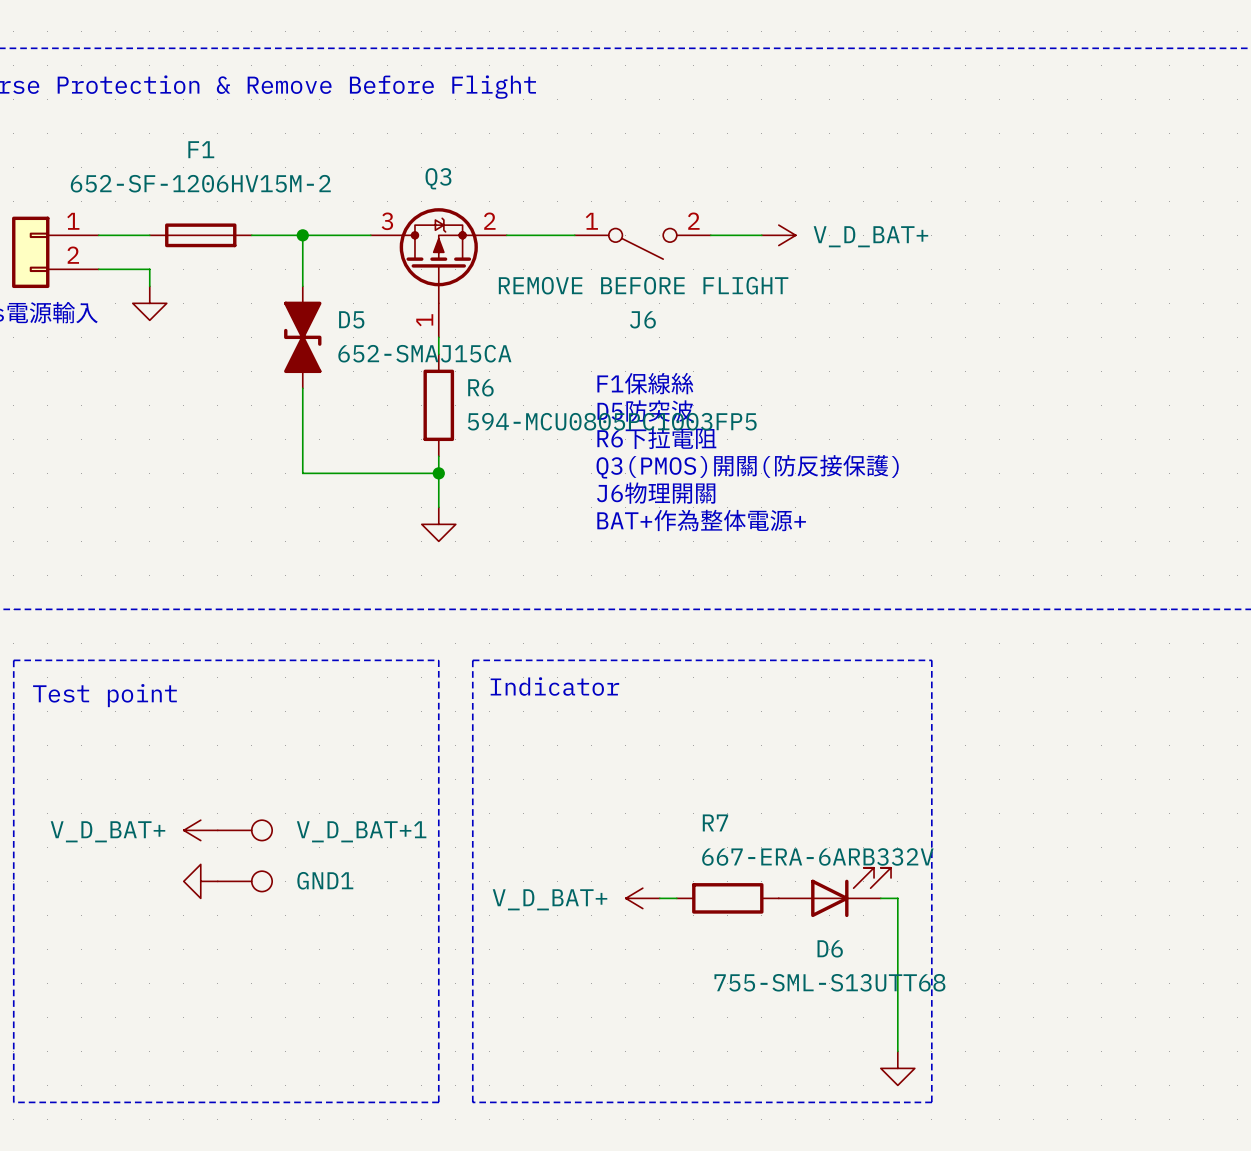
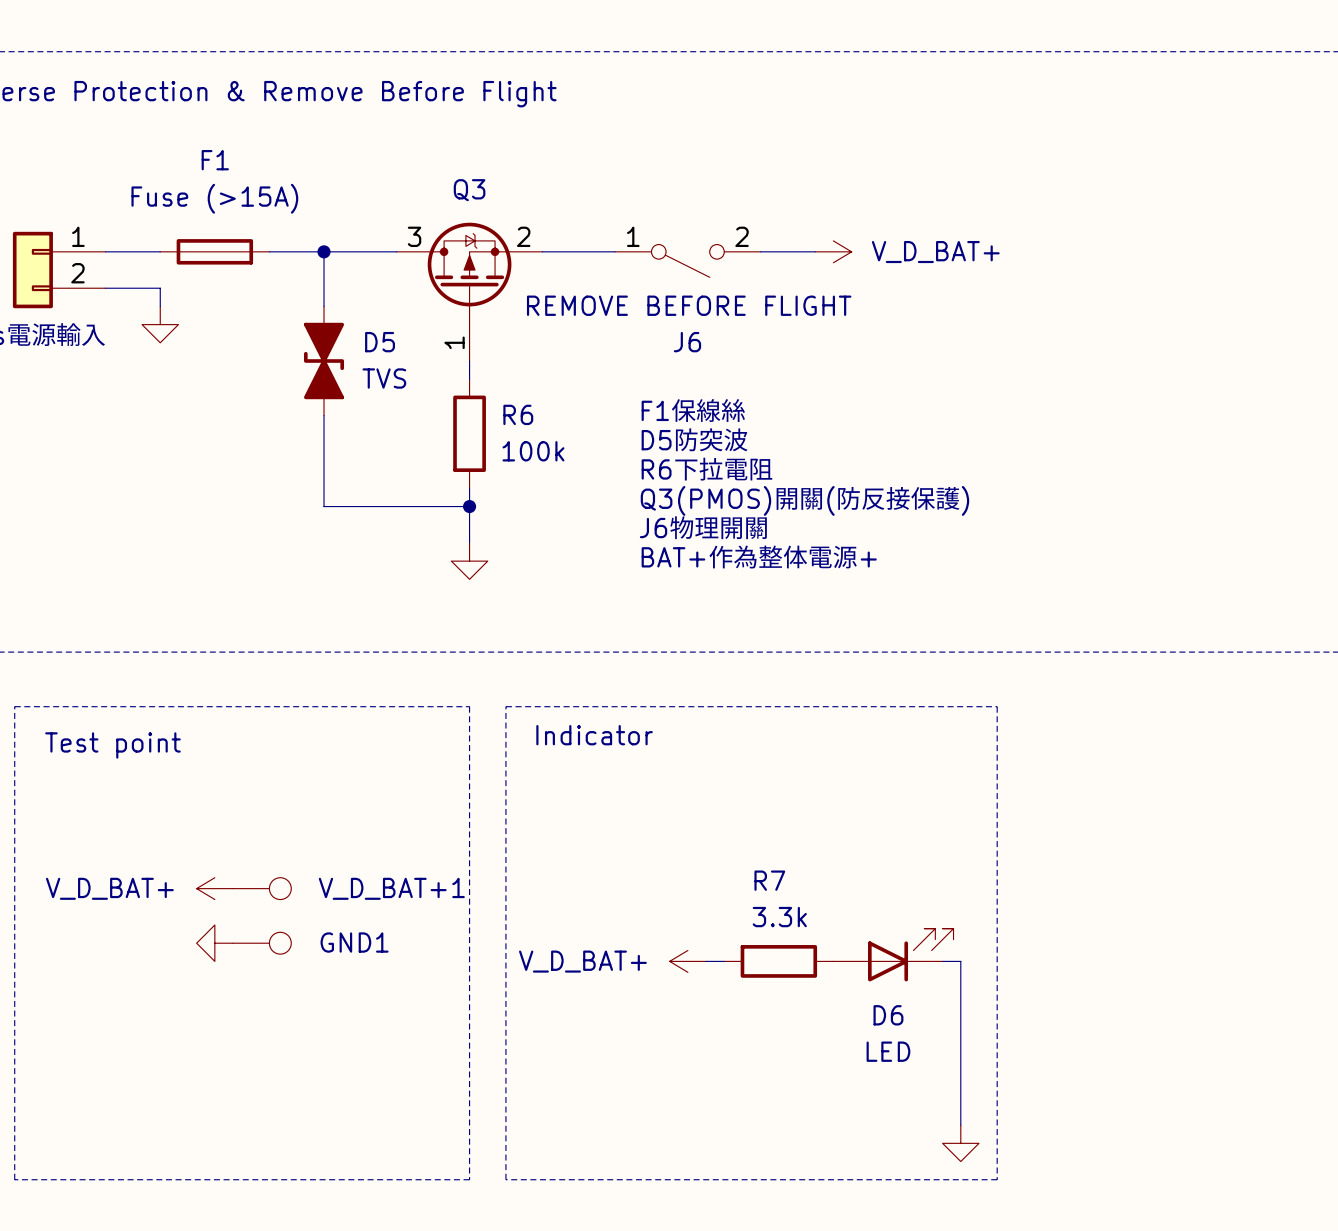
F1 value: 652-SF-1206HV15M-2 (200, 183) -> Fuse (>15A) (214, 198)
D5 value: 652-SMAJ15CA (424, 353) -> TVS (384, 378)
R6 value: 594-MCU0805PC1003FP5 (612, 421) -> 100k (533, 451)
R7 value: 667-ERA-6ARB332V (817, 856) -> 3.3k (779, 917)
D6 value: 755-SML-S13UTT68 (829, 982) -> LED (888, 1051)

